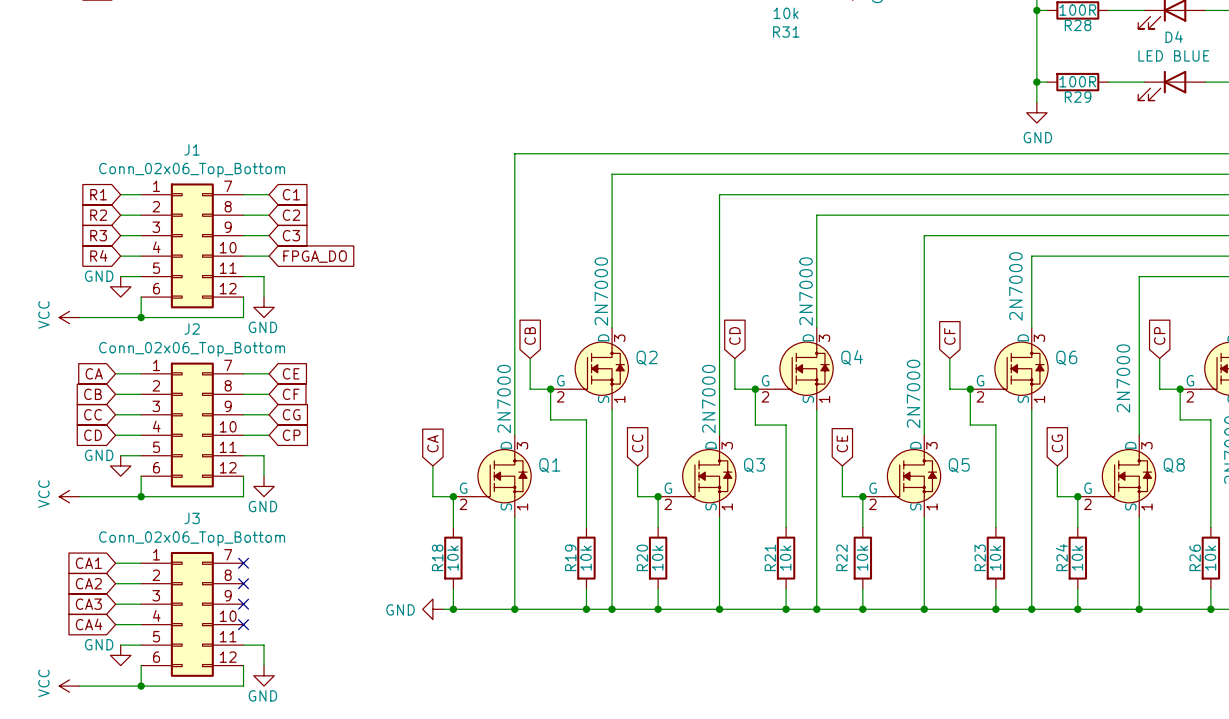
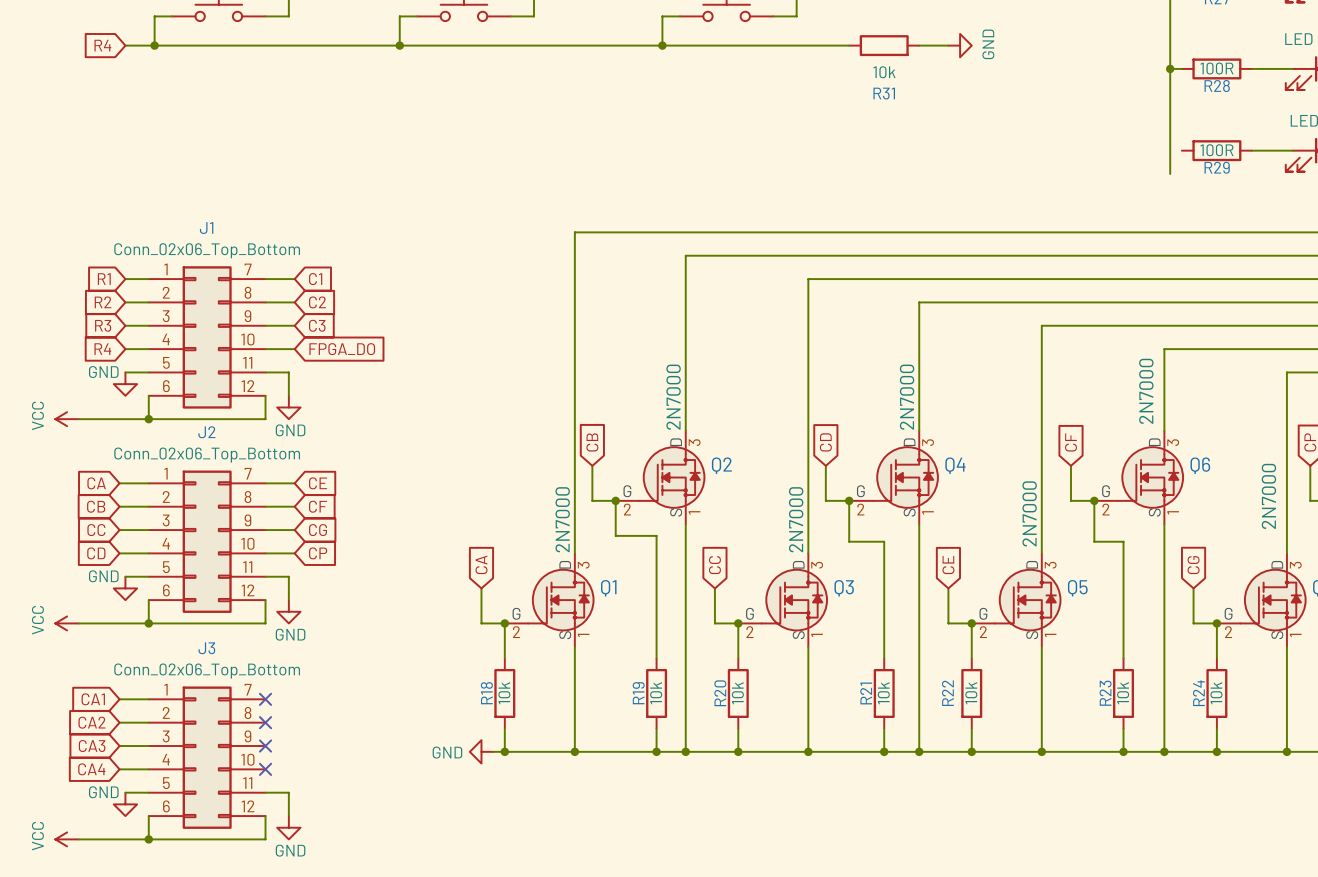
wire: (1036, 82) (1047, 82) -> none
junction: (1036, 82) -> none
power symbol: GND (1036, 112) -> none

